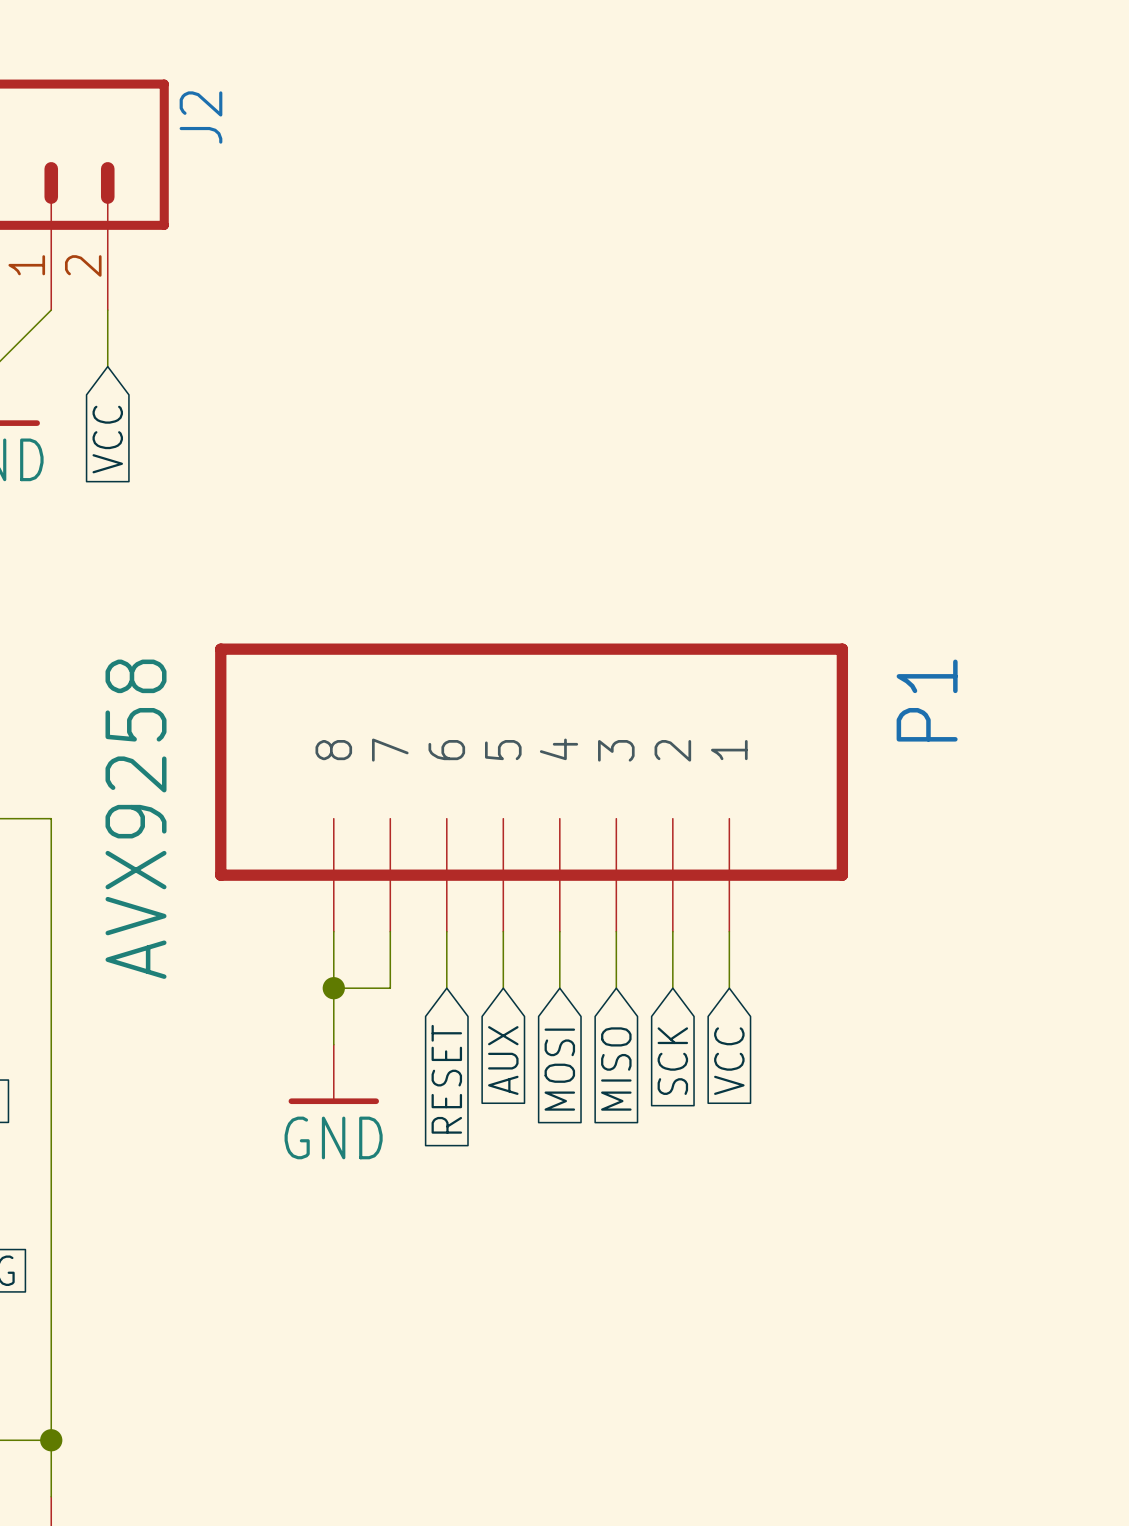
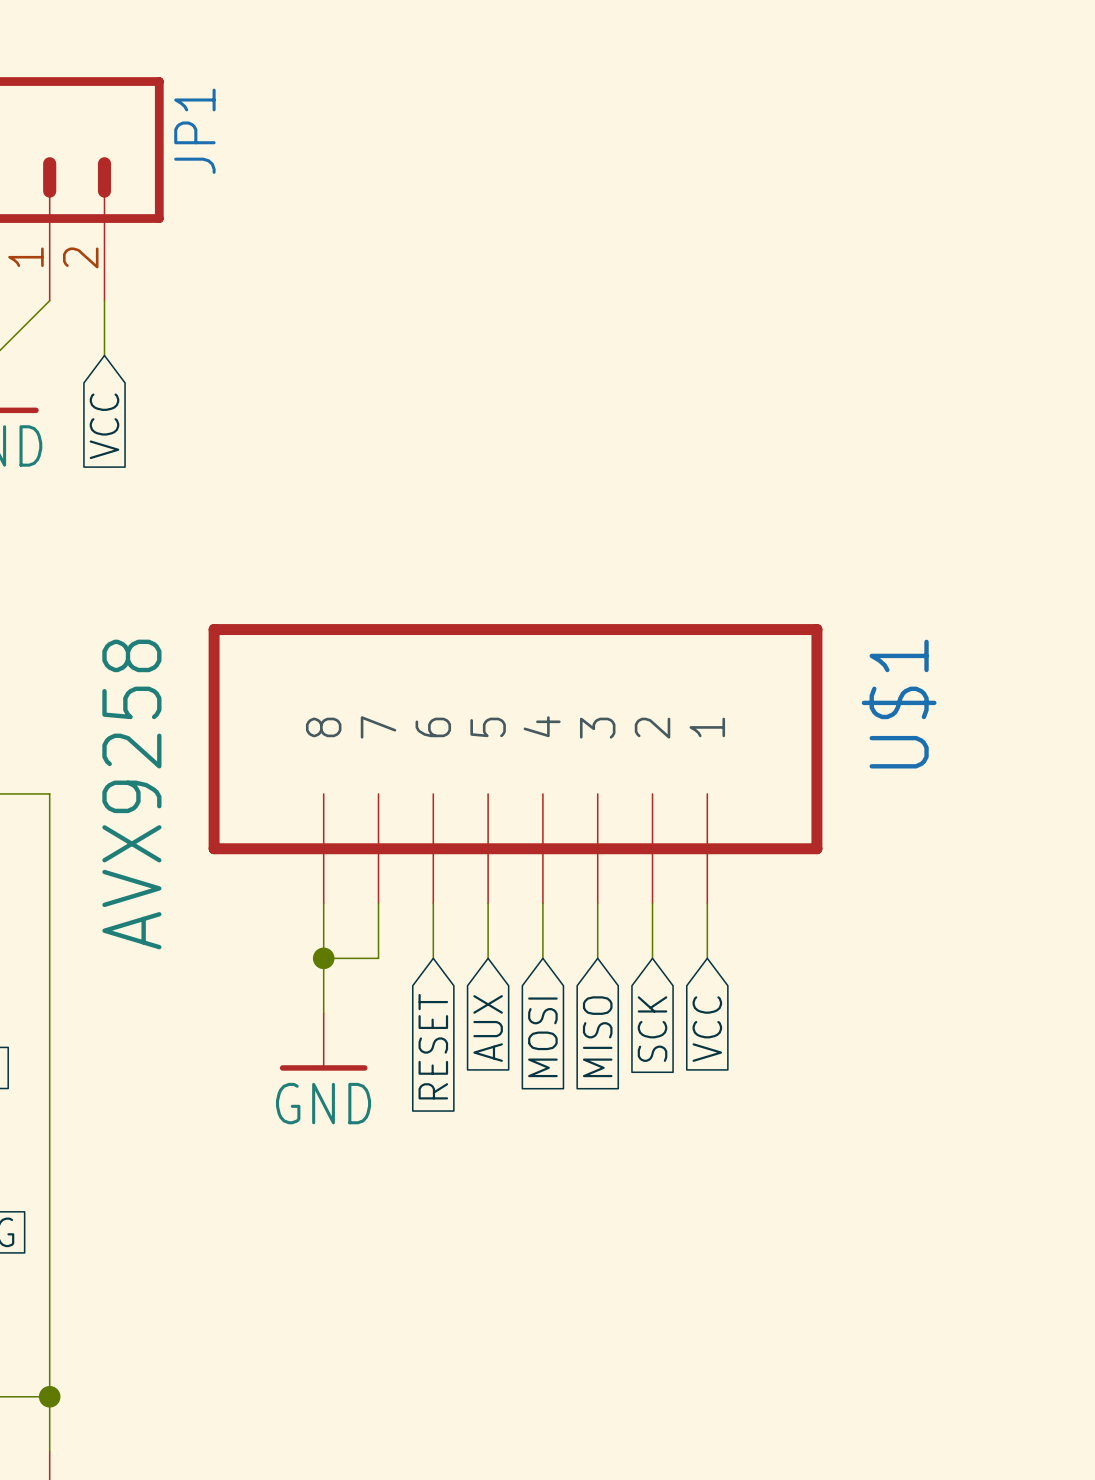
J2 name: J2 (200, 117) -> JP1 (194, 131)
P1 name: P1 (927, 700) -> U$1 (899, 704)

